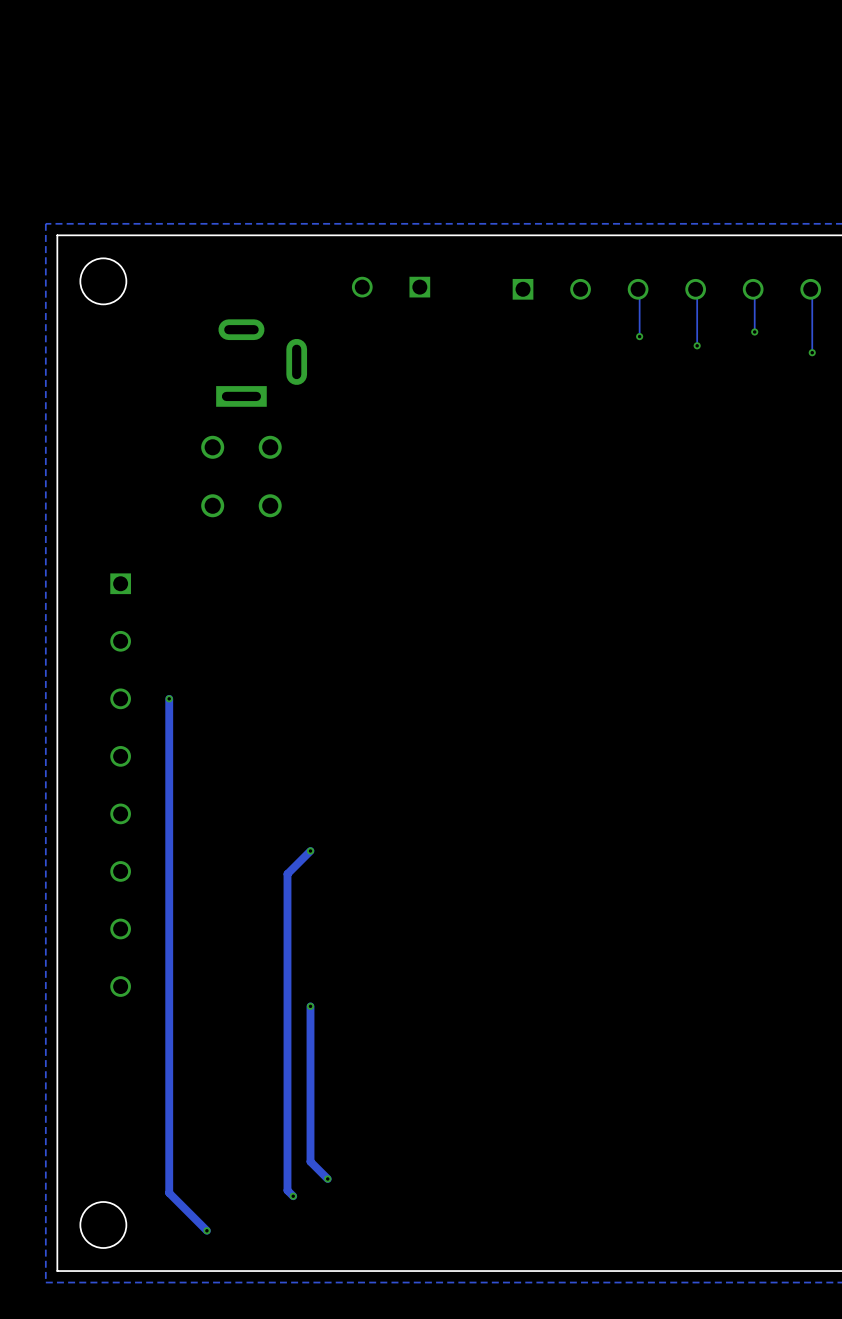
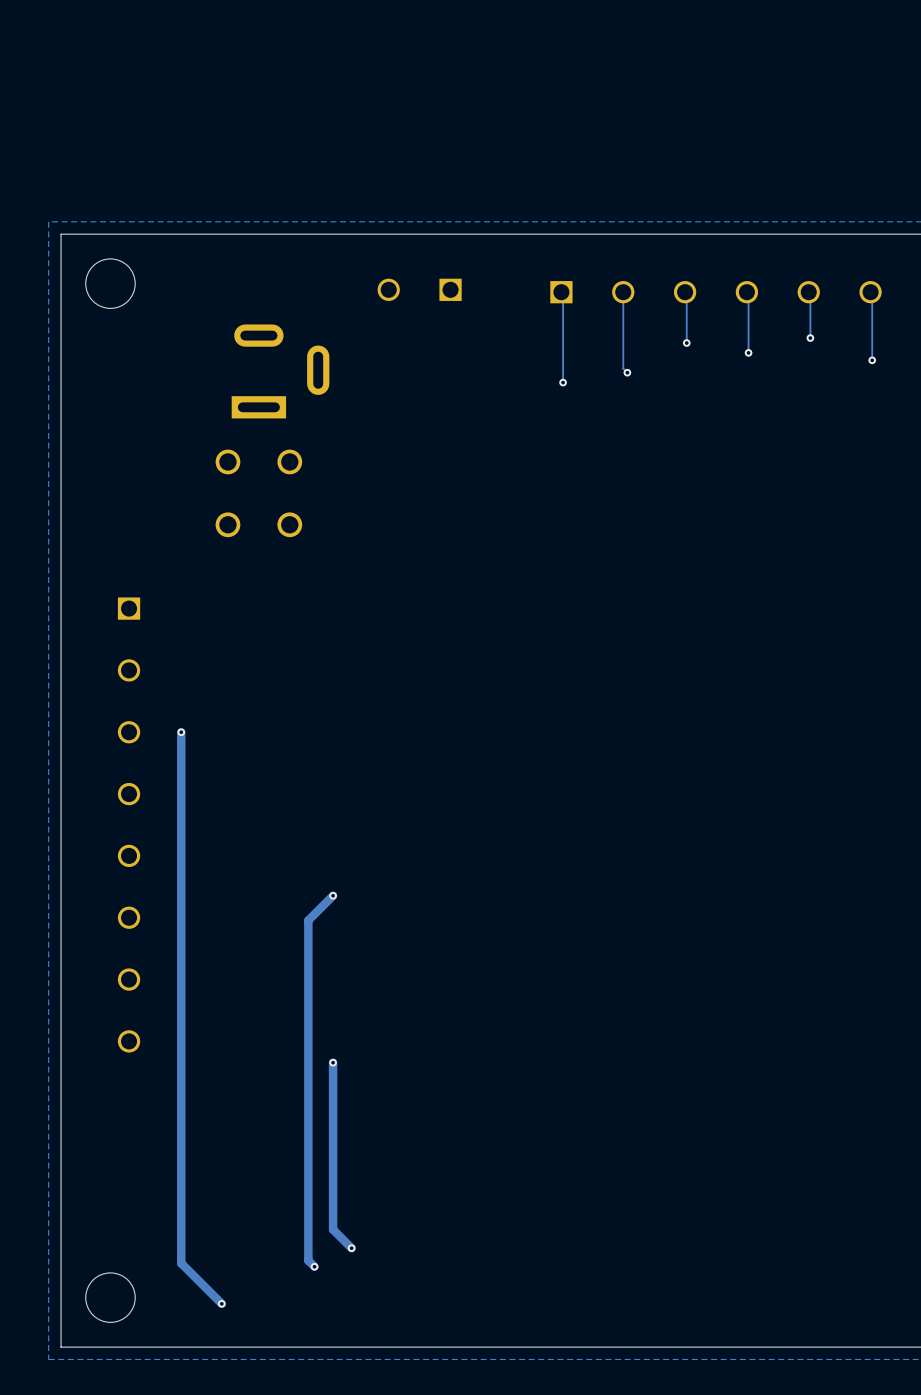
track: none -> (561, 292) (563, 293) (563, 382)
track: none -> (623, 292) (623, 368) (627, 372)
via: none -> (627, 372)
via: none -> (563, 382)

